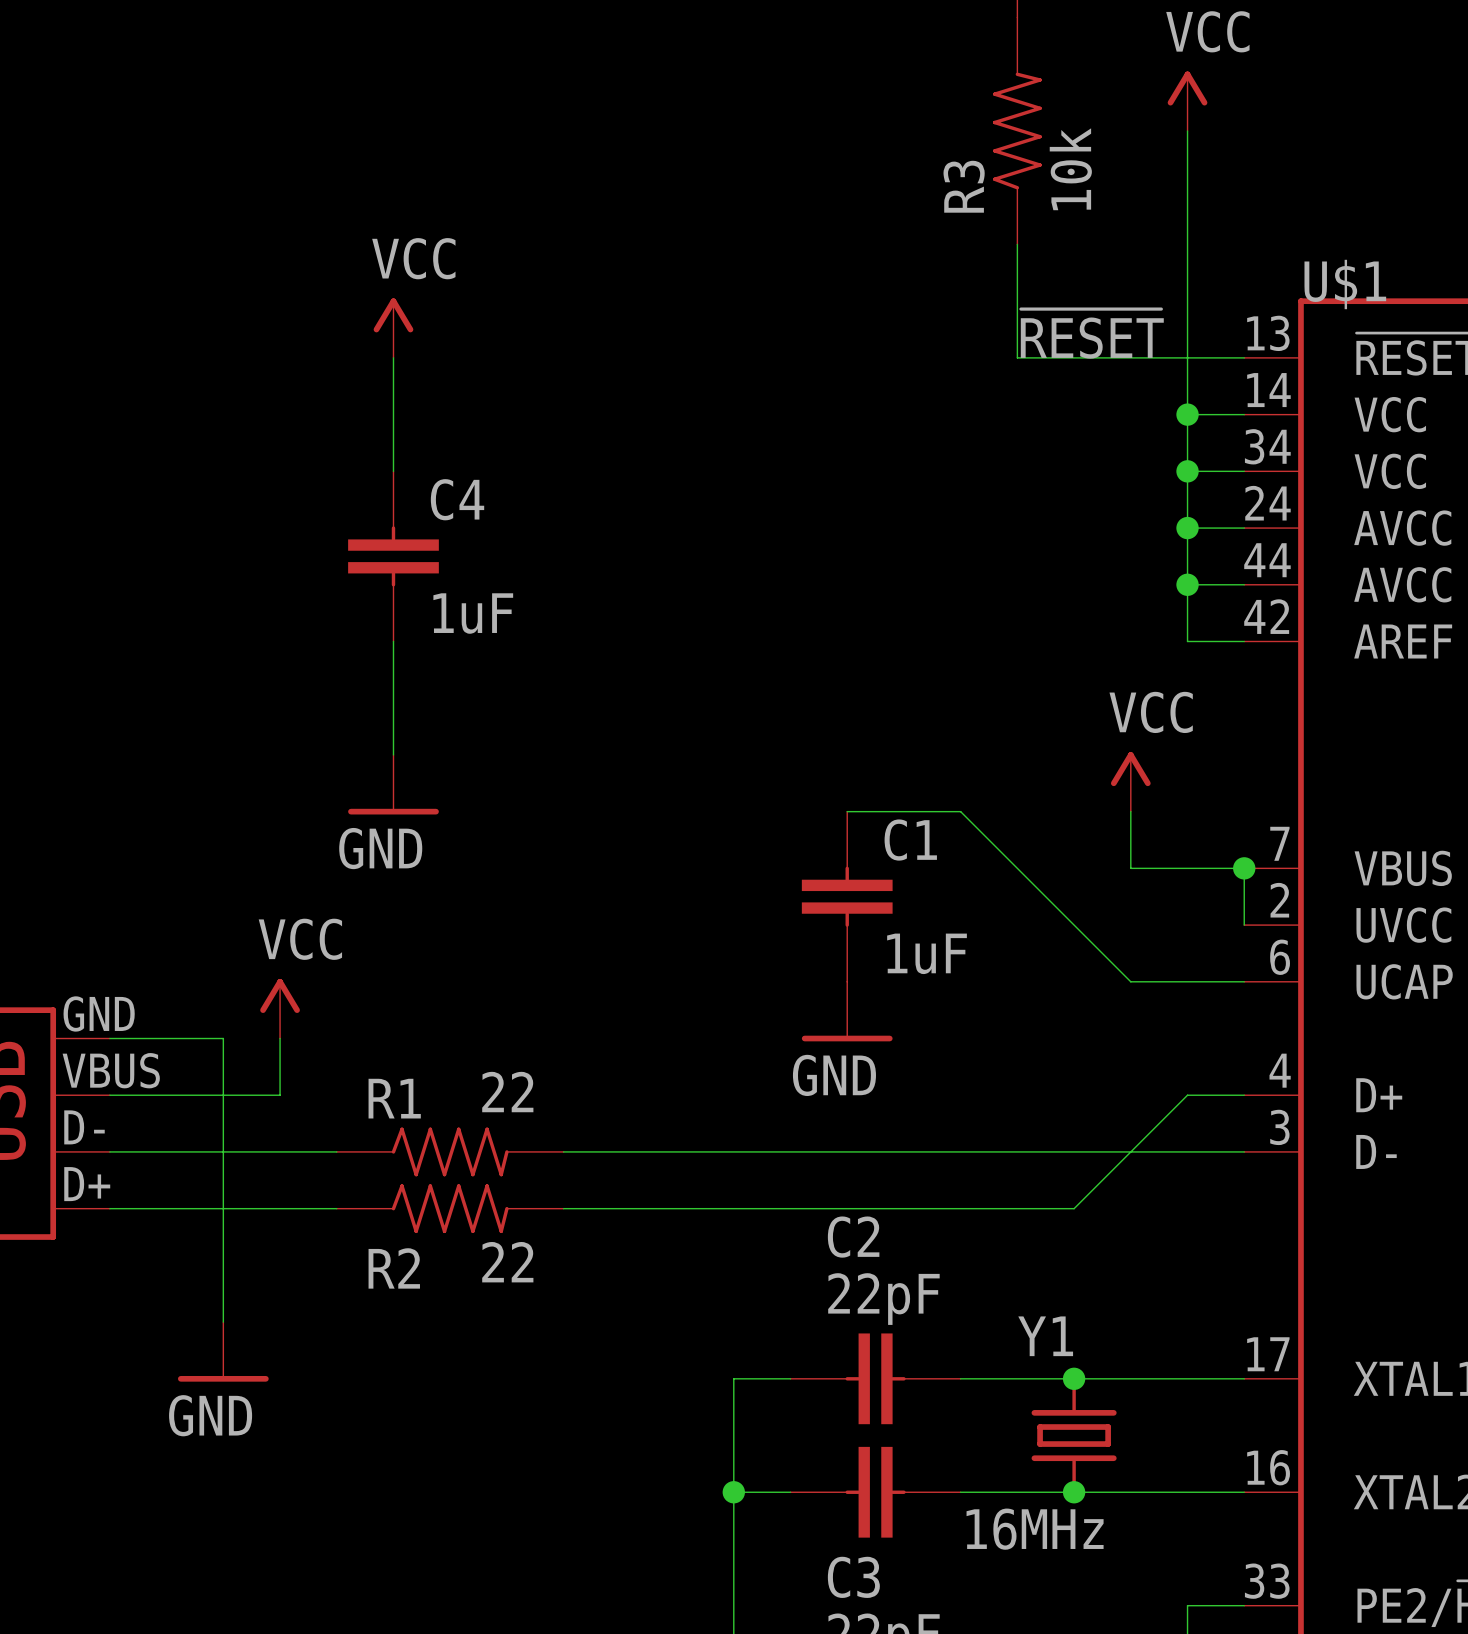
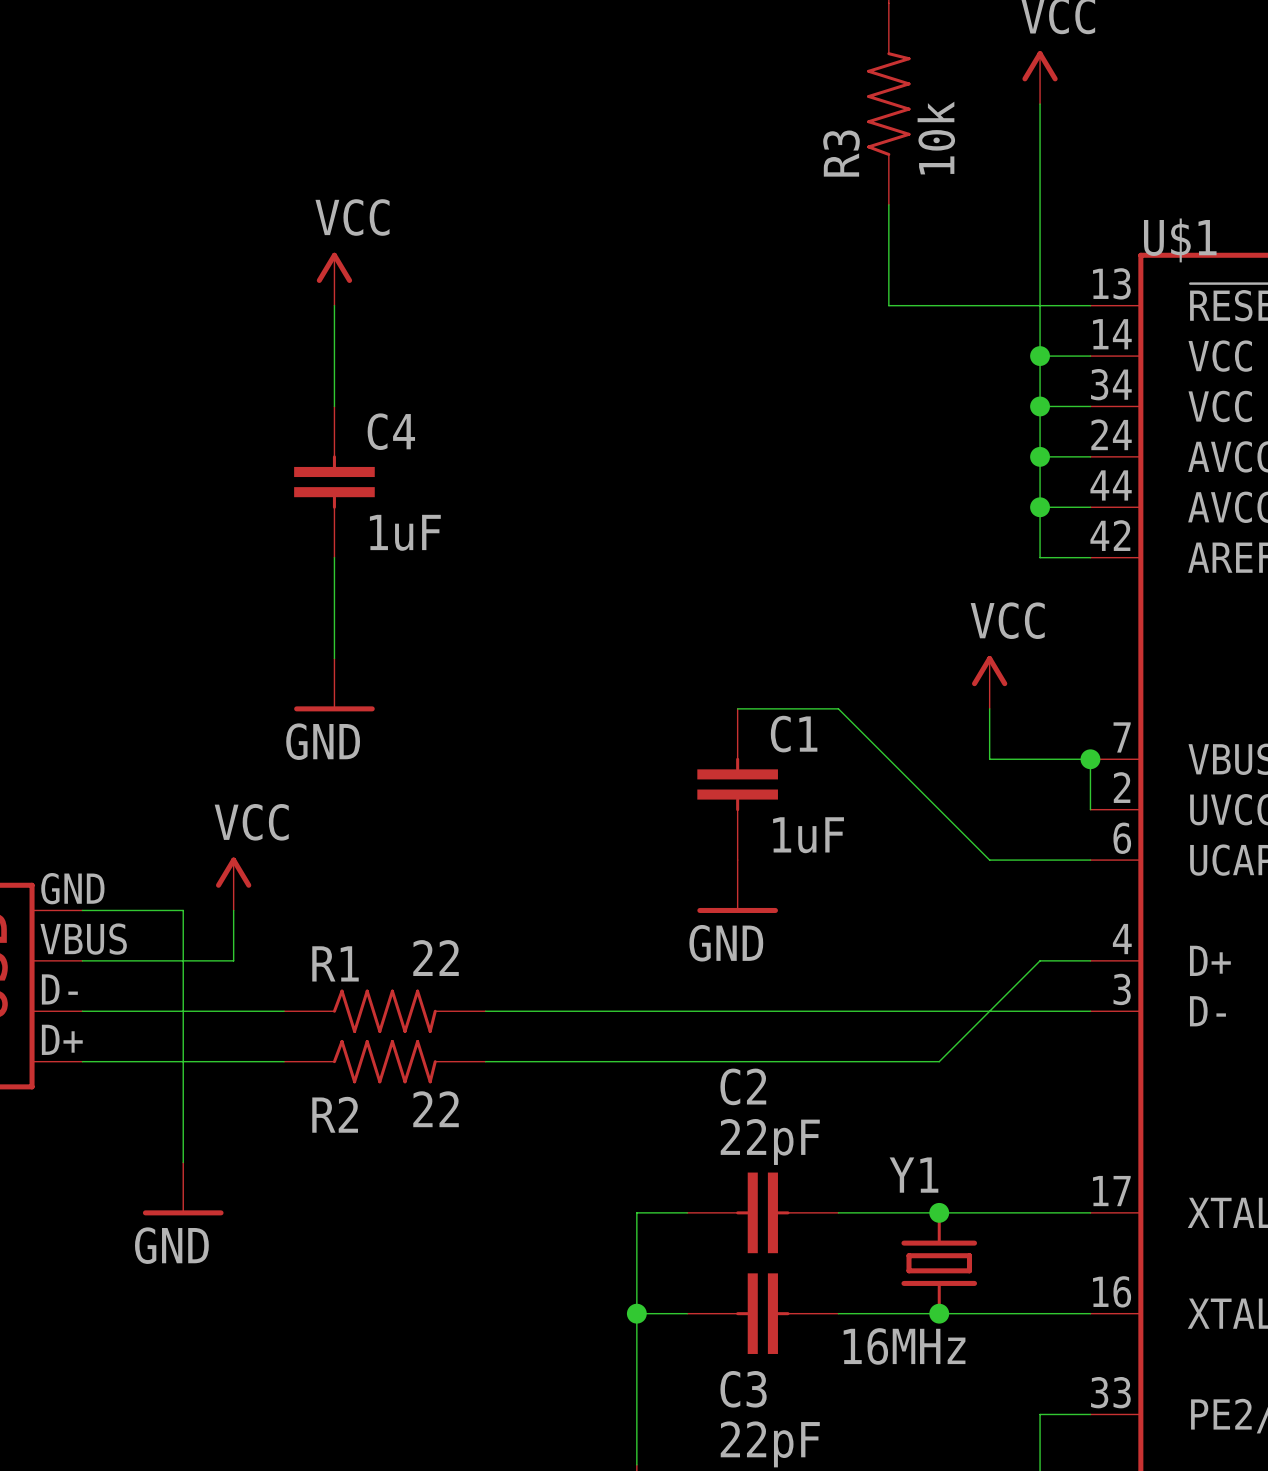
label: ~{RESET} (1092, 333) -> none

